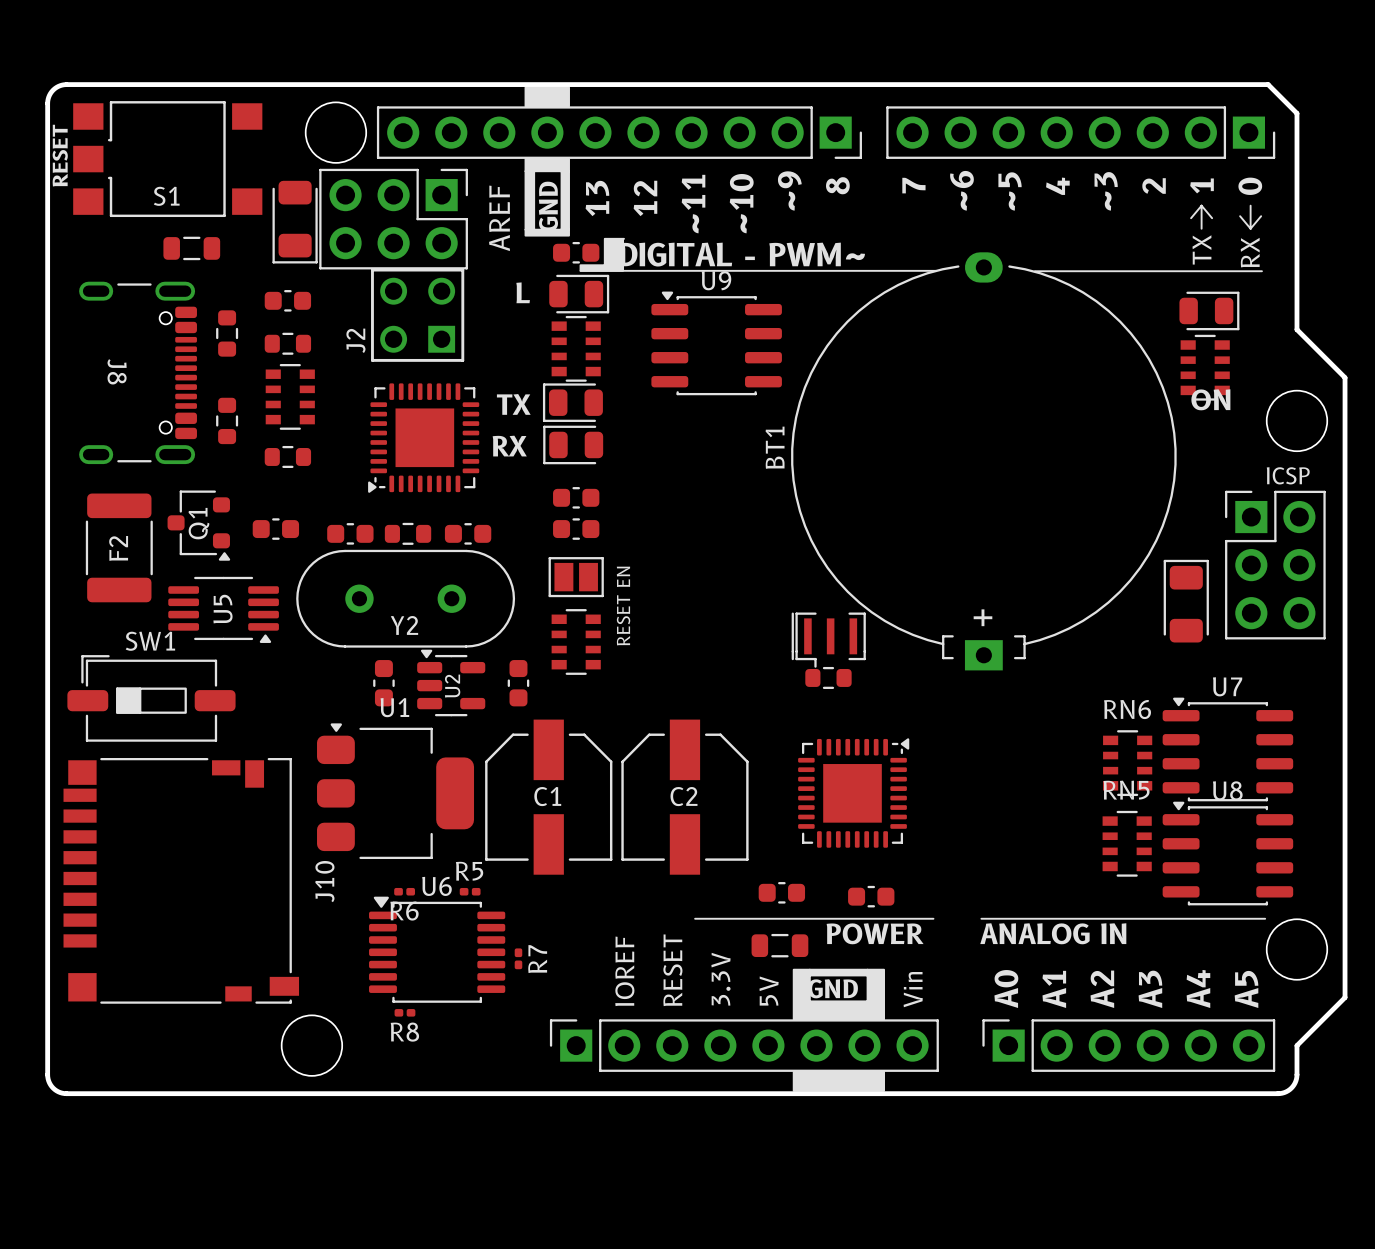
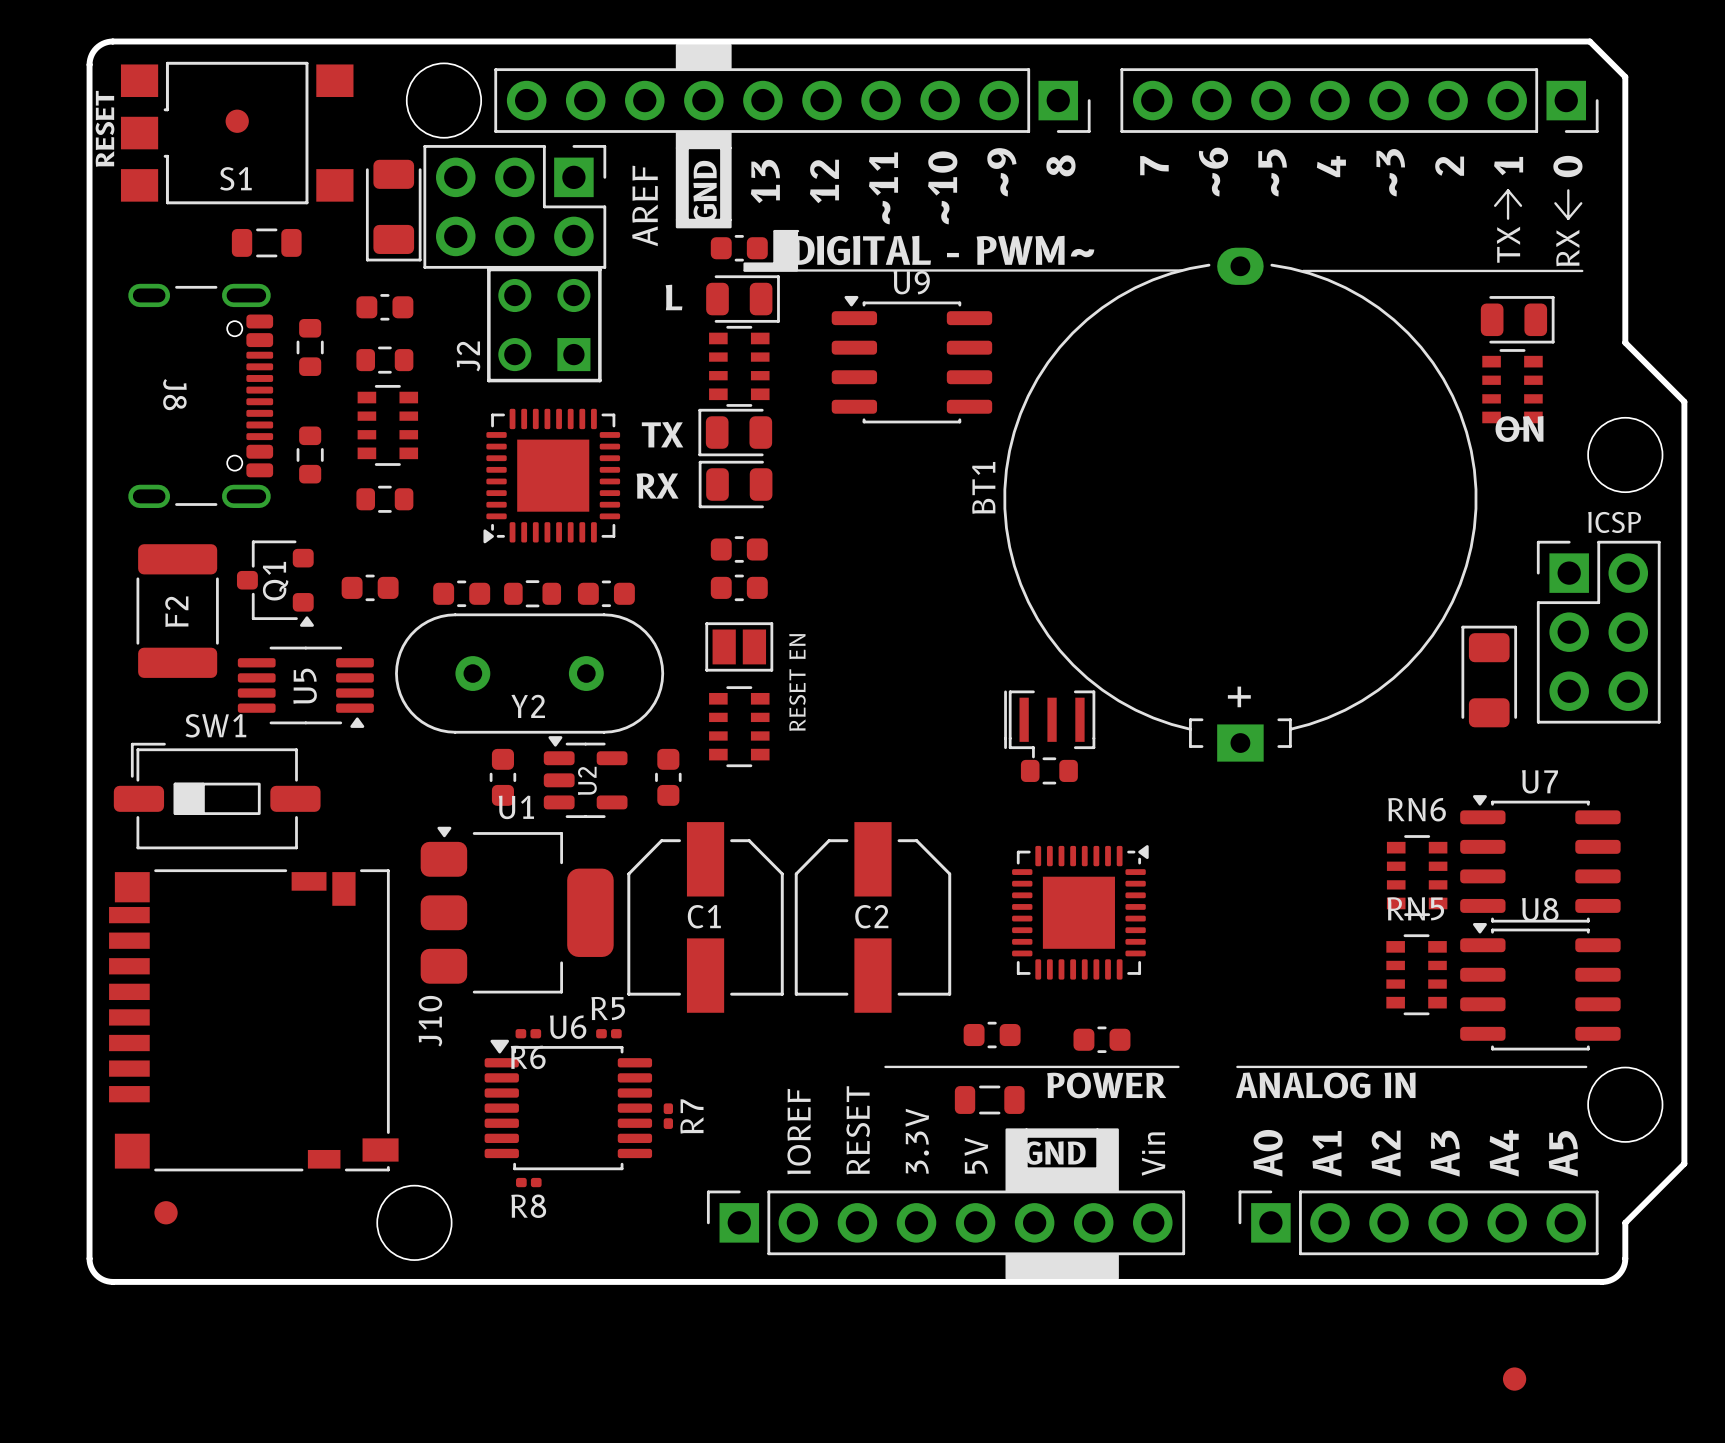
part: none -> (237, 121)
part: none -> (166, 1212)
part: none -> (1514, 1379)

